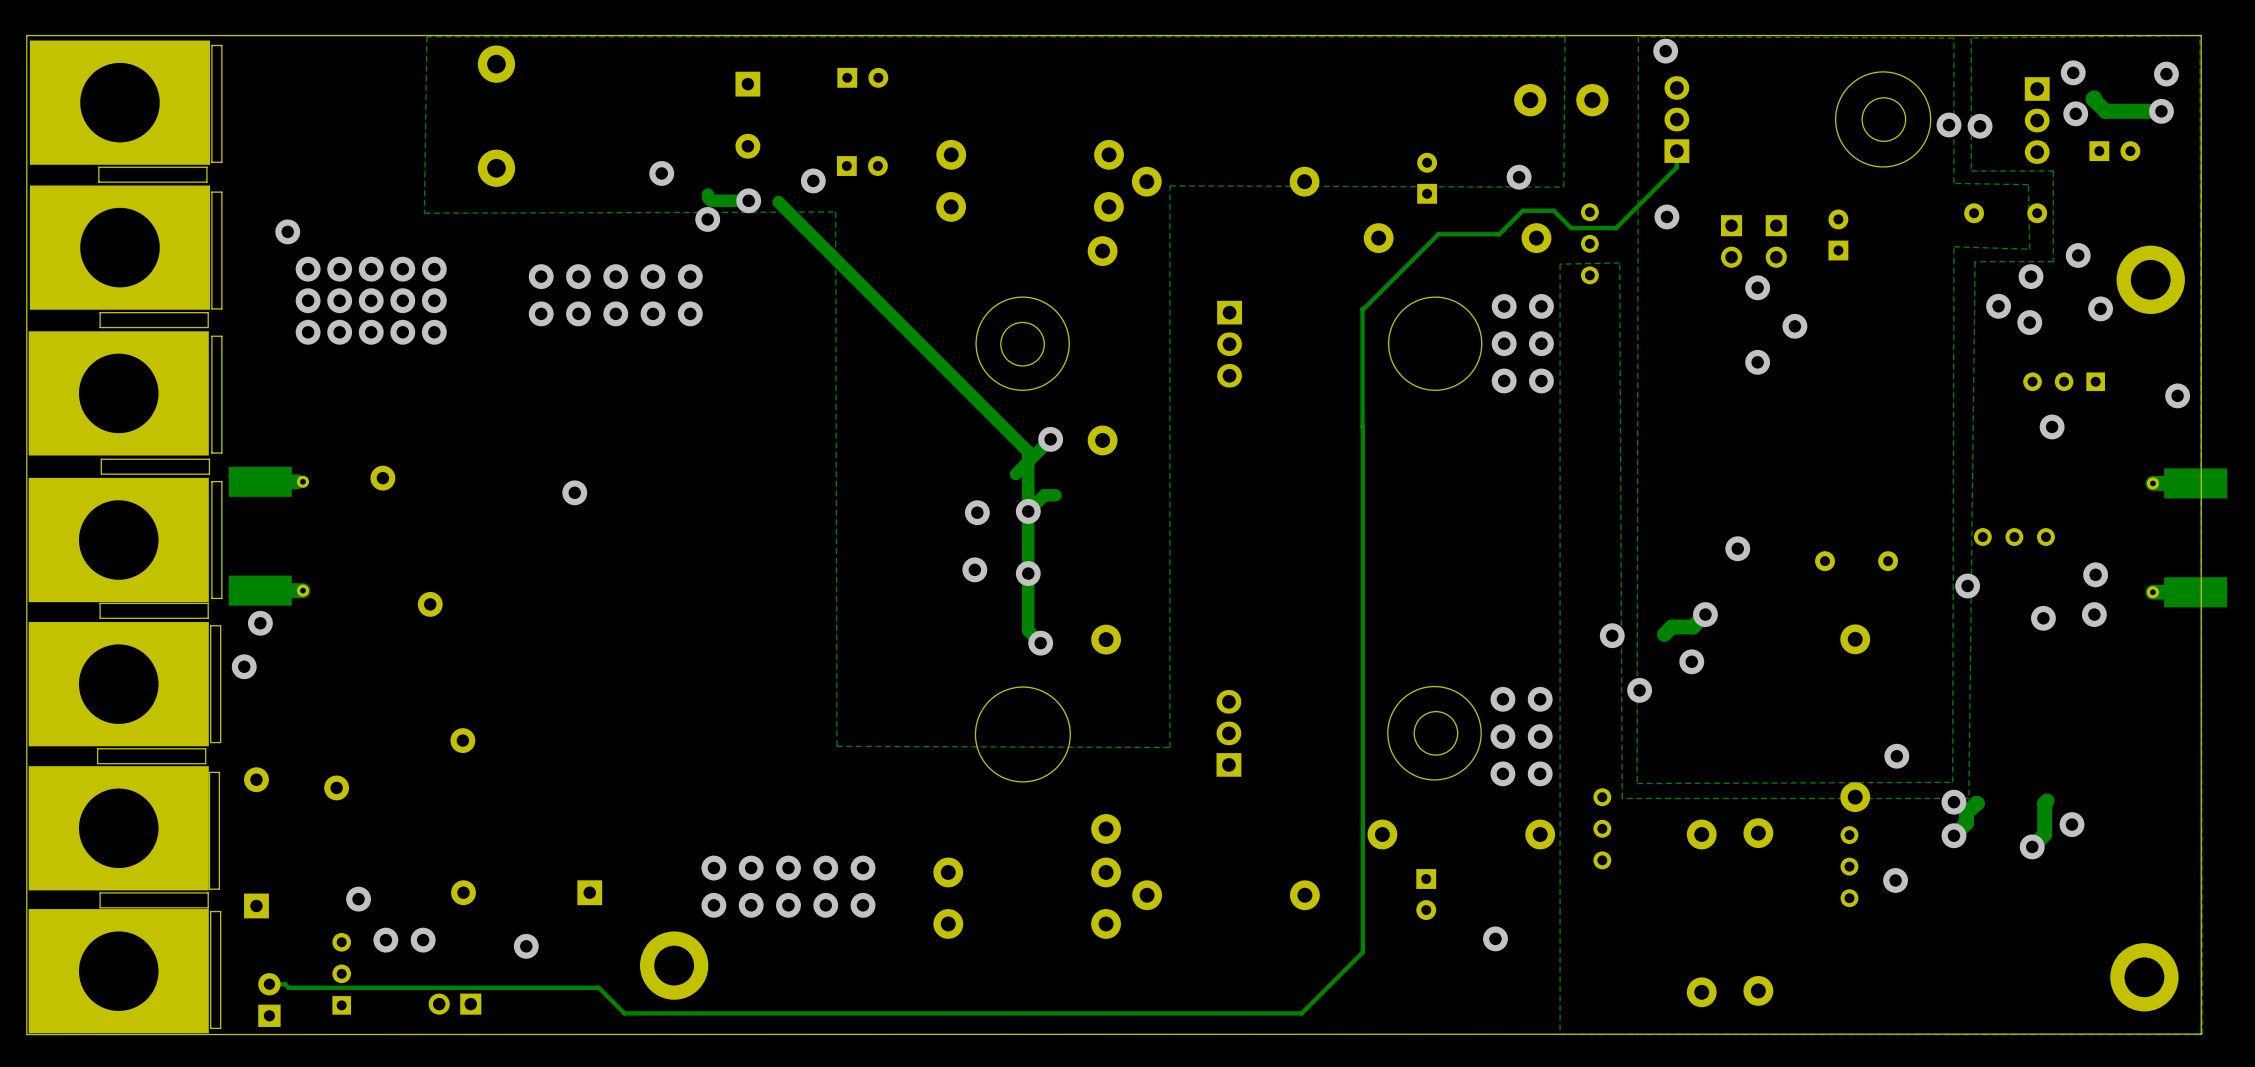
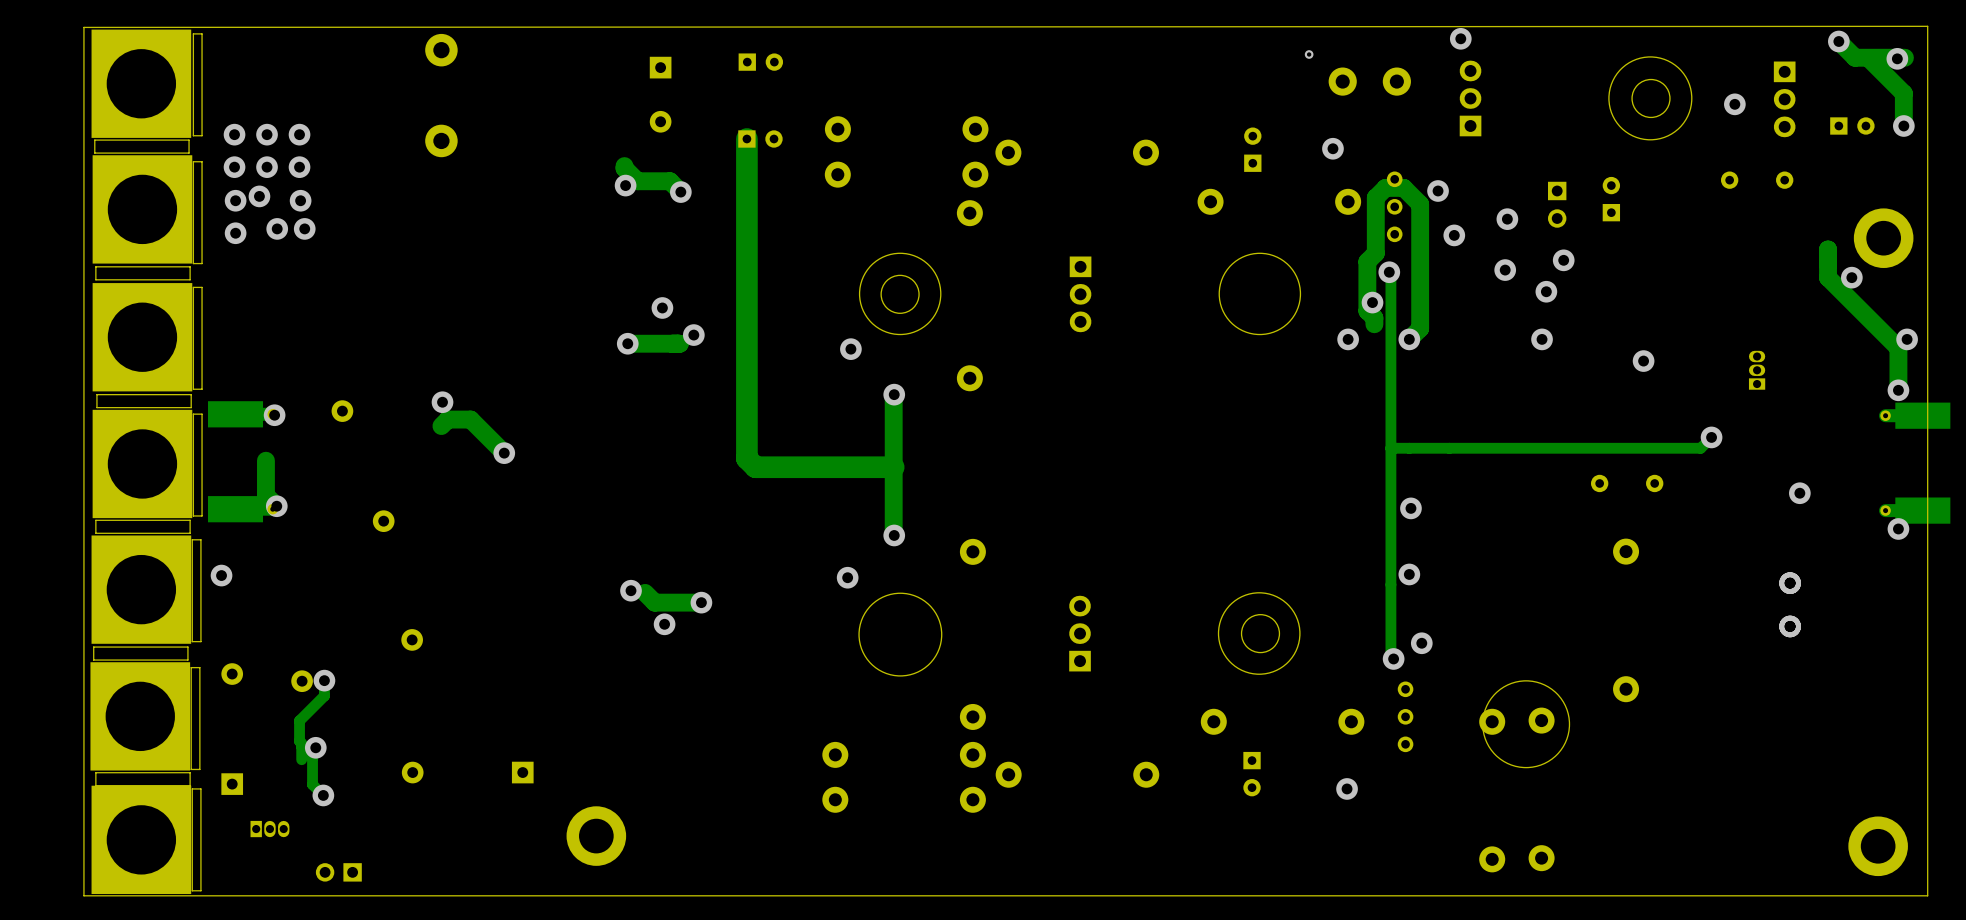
zone outline: (2199, 35) (2202, 1034) (1560, 1034) (1560, 264) (1619, 262) (1622, 798) (1968, 798) (1975, 261) (2053, 261) (2053, 170) (1971, 170) (1971, 38) (2199, 35) -> none
zone outline: (1565, 36) (1563, 187) (1169, 185) (1169, 747) (836, 746) (835, 211) (424, 213) (426, 36) (1565, 36) -> none
zone outline: (1638, 36) (1637, 783) (1952, 782) (1953, 246) (2029, 249) (2028, 184) (1953, 183) (1953, 38) (1638, 36) -> none
board edge: (2201, 36) (26, 35) (26, 1034) (2201, 1034) -> (1927, 26) (83, 27) (83, 895) (1927, 895)
track: none -> (1838, 41) (1855, 57) (1904, 57)
via: none -> (1838, 41)
via: none -> (1309, 54)
via: (2073, 72) -> none
track: none -> (1871, 61) (1903, 93) (1903, 125)
track: (2094, 97) (2093, 98) (2105, 111) (2161, 111) -> none
part: (119, 102) -> none
part: none -> (141, 83)
via position: (2161, 111) -> (1903, 125)
via: (2075, 113) -> none
via: (1948, 125) -> none
track: (1676, 151) (1676, 167) (1616, 228) (1571, 228) (1553, 210) (1522, 210) (1499, 234) (1438, 234) (1362, 308) (1362, 952) (1301, 1013) (624, 1013) (598, 987) (288, 987) (285, 984) (269, 984) -> none
via: none -> (234, 134)
via: none -> (267, 134)
via: none -> (299, 134)
track: none -> (746, 138) (746, 458) (755, 467) (893, 467)
via: (661, 173) -> none
via: (813, 180) -> none
track: (708, 194) (711, 200) (748, 200) -> none
track: none -> (624, 166) (637, 181) (670, 181) (680, 192)
via: none -> (234, 167)
via: none -> (267, 167)
via: none -> (299, 167)
via: (748, 200) -> none
track: (778, 202) (1028, 451) (1028, 630) (1040, 643) -> none
via position: (1666, 216) -> (1438, 190)
via: none -> (680, 192)
via: none -> (235, 200)
via: none -> (300, 200)
part: (1731, 241) -> none
part: none -> (142, 209)
part: (119, 247) -> none
via: (2078, 255) -> none
via: none -> (1507, 219)
via: (371, 269) -> none
via: (402, 269) -> none
via: (434, 269) -> none
via: none -> (235, 233)
via: (541, 276) -> none
via: (578, 276) -> none
via: (615, 276) -> none
via: (653, 276) -> none
via: (690, 276) -> none
via: none -> (1454, 235)
via: (2031, 276) -> none
via: (1757, 287) -> none
track: none -> (1828, 249) (1828, 277) (1898, 348) (1898, 390)
via: (308, 300) -> none
via: (339, 300) -> none
via: (371, 300) -> none
via: (402, 300) -> none
via: (434, 300) -> none
via: none -> (1563, 260)
via: (1504, 306) -> none
via: (1541, 306) -> none
via: (1998, 306) -> none
via position: (2100, 308) -> (1851, 277)
via: (541, 313) -> none
via: (578, 313) -> none
via: (615, 313) -> none
via: (653, 313) -> none
via: (690, 313) -> none
via: none -> (1505, 270)
track: none -> (1389, 272) (1390, 273) (1390, 656) (1393, 658)
via: none -> (1389, 272)
via: (2029, 322) -> none
via: (1794, 326) -> none
via: (308, 332) -> none
via: (339, 332) -> none
via: (371, 332) -> none
via: (402, 332) -> none
via: (434, 332) -> none
via: none -> (1546, 291)
via: (1504, 343) -> none
via: (1541, 343) -> none
via: none -> (1372, 302)
via: none -> (662, 307)
via: (1757, 362) -> none
track: none -> (1374, 324) (1374, 318) (1367, 310) (1367, 261) (1375, 253) (1375, 197) (1385, 187) (1403, 187) (1420, 204) (1420, 328) (1409, 339)
via: (1504, 380) -> none
via position: (1541, 380) -> (1348, 339)
part: (2064, 381) -> none
via: none -> (693, 335)
part: (118, 393) -> none
part: none -> (142, 337)
via: none -> (1409, 339)
via: none -> (1542, 339)
via: none -> (627, 343)
track: none -> (679, 343) (627, 343)
via: none -> (850, 349)
via: none -> (1643, 361)
via: (2052, 426) -> none
part: none -> (1757, 370)
track: (1050, 439) (1015, 474) -> none
via: (1050, 439) -> none
via: none -> (1898, 390)
track: none -> (894, 394) (894, 535)
via: none -> (894, 394)
via: none -> (442, 402)
via: none -> (274, 415)
via position: (574, 492) -> (504, 453)
track: none -> (441, 426) (447, 419) (470, 419) (504, 453)
track: (1055, 495) (1044, 495) (1028, 511) -> none
track: none -> (1711, 437) (1700, 448) (1390, 448)
via: none -> (1711, 437)
via: (1028, 511) -> none
via: (977, 512) -> none
track: none -> (265, 460) (265, 495) (276, 506)
part: (2014, 537) -> none
part: none -> (142, 463)
part: (118, 540) -> none
via: (1737, 548) -> none
via: (974, 569) -> none
via: none -> (1799, 493)
via: (1028, 573) -> none
via: (2095, 574) -> none
via: (1967, 585) -> none
via: none -> (1410, 508)
via: none -> (1898, 528)
track: (1705, 614) (1693, 627) (1671, 627) (1664, 634) -> none
via: (1705, 614) -> none
via: (2094, 614) -> none
via: (2043, 618) -> none
via: none -> (894, 535)
via position: (260, 623) -> (276, 506)
via: (1612, 635) -> none
via: (1040, 643) -> none
via: (1691, 661) -> none
via: none -> (1409, 574)
via: none -> (847, 577)
via: none -> (1790, 583)
part: none -> (141, 589)
part: (118, 684) -> none
via: none -> (631, 590)
track: none -> (645, 592) (654, 602) (701, 602)
via: (1639, 690) -> none
via: none -> (701, 602)
via: (1502, 699) -> none
via: (1540, 699) -> none
via: none -> (664, 624)
via: none -> (1790, 626)
via: (1502, 736) -> none
via: (1540, 736) -> none
via: none -> (1421, 643)
via: (1896, 756) -> none
via: none -> (1393, 658)
via: (1502, 773) -> none
via: (1540, 773) -> none
track: none -> (324, 680) (324, 695) (299, 720) (301, 759)
via: none -> (324, 680)
round board edge: none -> [1482, 680, 1570, 768]
track: (2047, 800) (2044, 803) (2044, 834) (2032, 846) -> none
via: (1953, 802) -> none
track: (1977, 803) (1966, 813) (1966, 823) (1953, 835) -> none
via: (2072, 824) -> none
part: (118, 828) -> none
part: none -> (140, 716)
via: (1953, 835) -> none
via: (2032, 846) -> none
track: none -> (301, 746) (312, 757) (312, 784) (323, 795)
via: none -> (315, 747)
part: (1849, 866) -> none
via: (713, 868) -> none
via: (751, 868) -> none
via: (788, 868) -> none
via: (825, 868) -> none
via: (863, 868) -> none
via: (1895, 880) -> none
via: (358, 899) -> none
via: (713, 905) -> none
via: (751, 905) -> none
via: (788, 905) -> none
via: (825, 905) -> none
via: (863, 905) -> none
via: none -> (323, 795)
via position: (1495, 938) -> (1347, 788)
via: (385, 940) -> none
via: (423, 940) -> none
via: (526, 946) -> none
part: none -> (269, 829)
part: none -> (141, 839)
part: (118, 971) -> none
part: (341, 973) -> none
part: (269, 1000) -> none
part position: (454, 1004) -> (338, 872)

